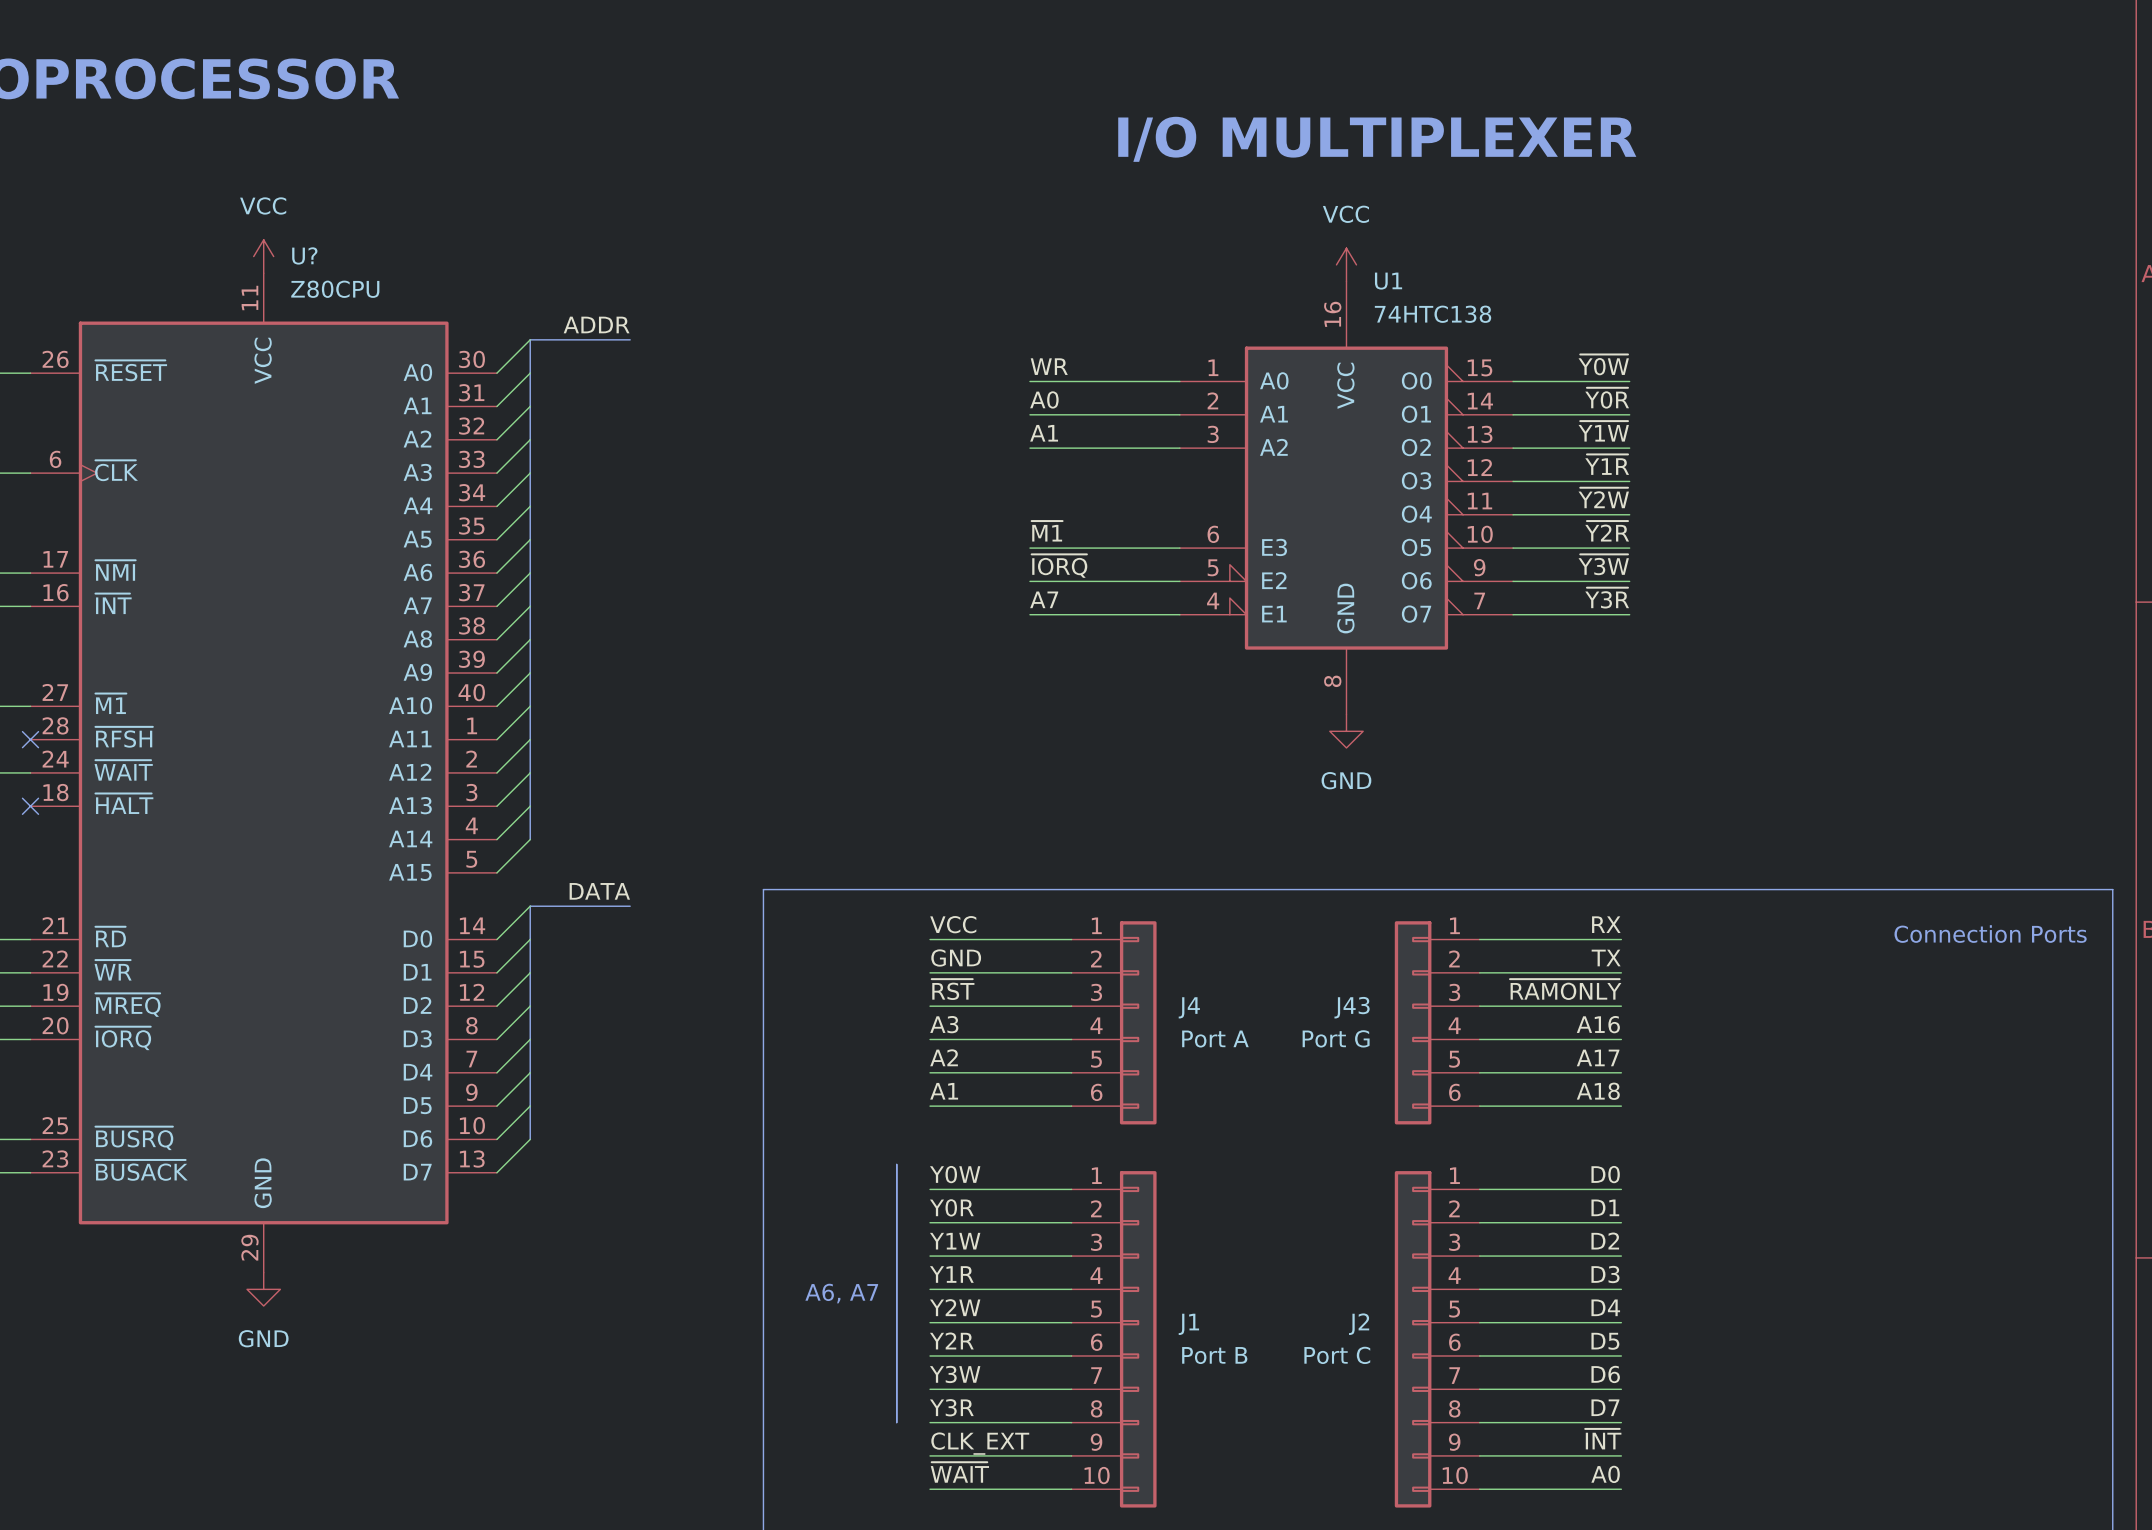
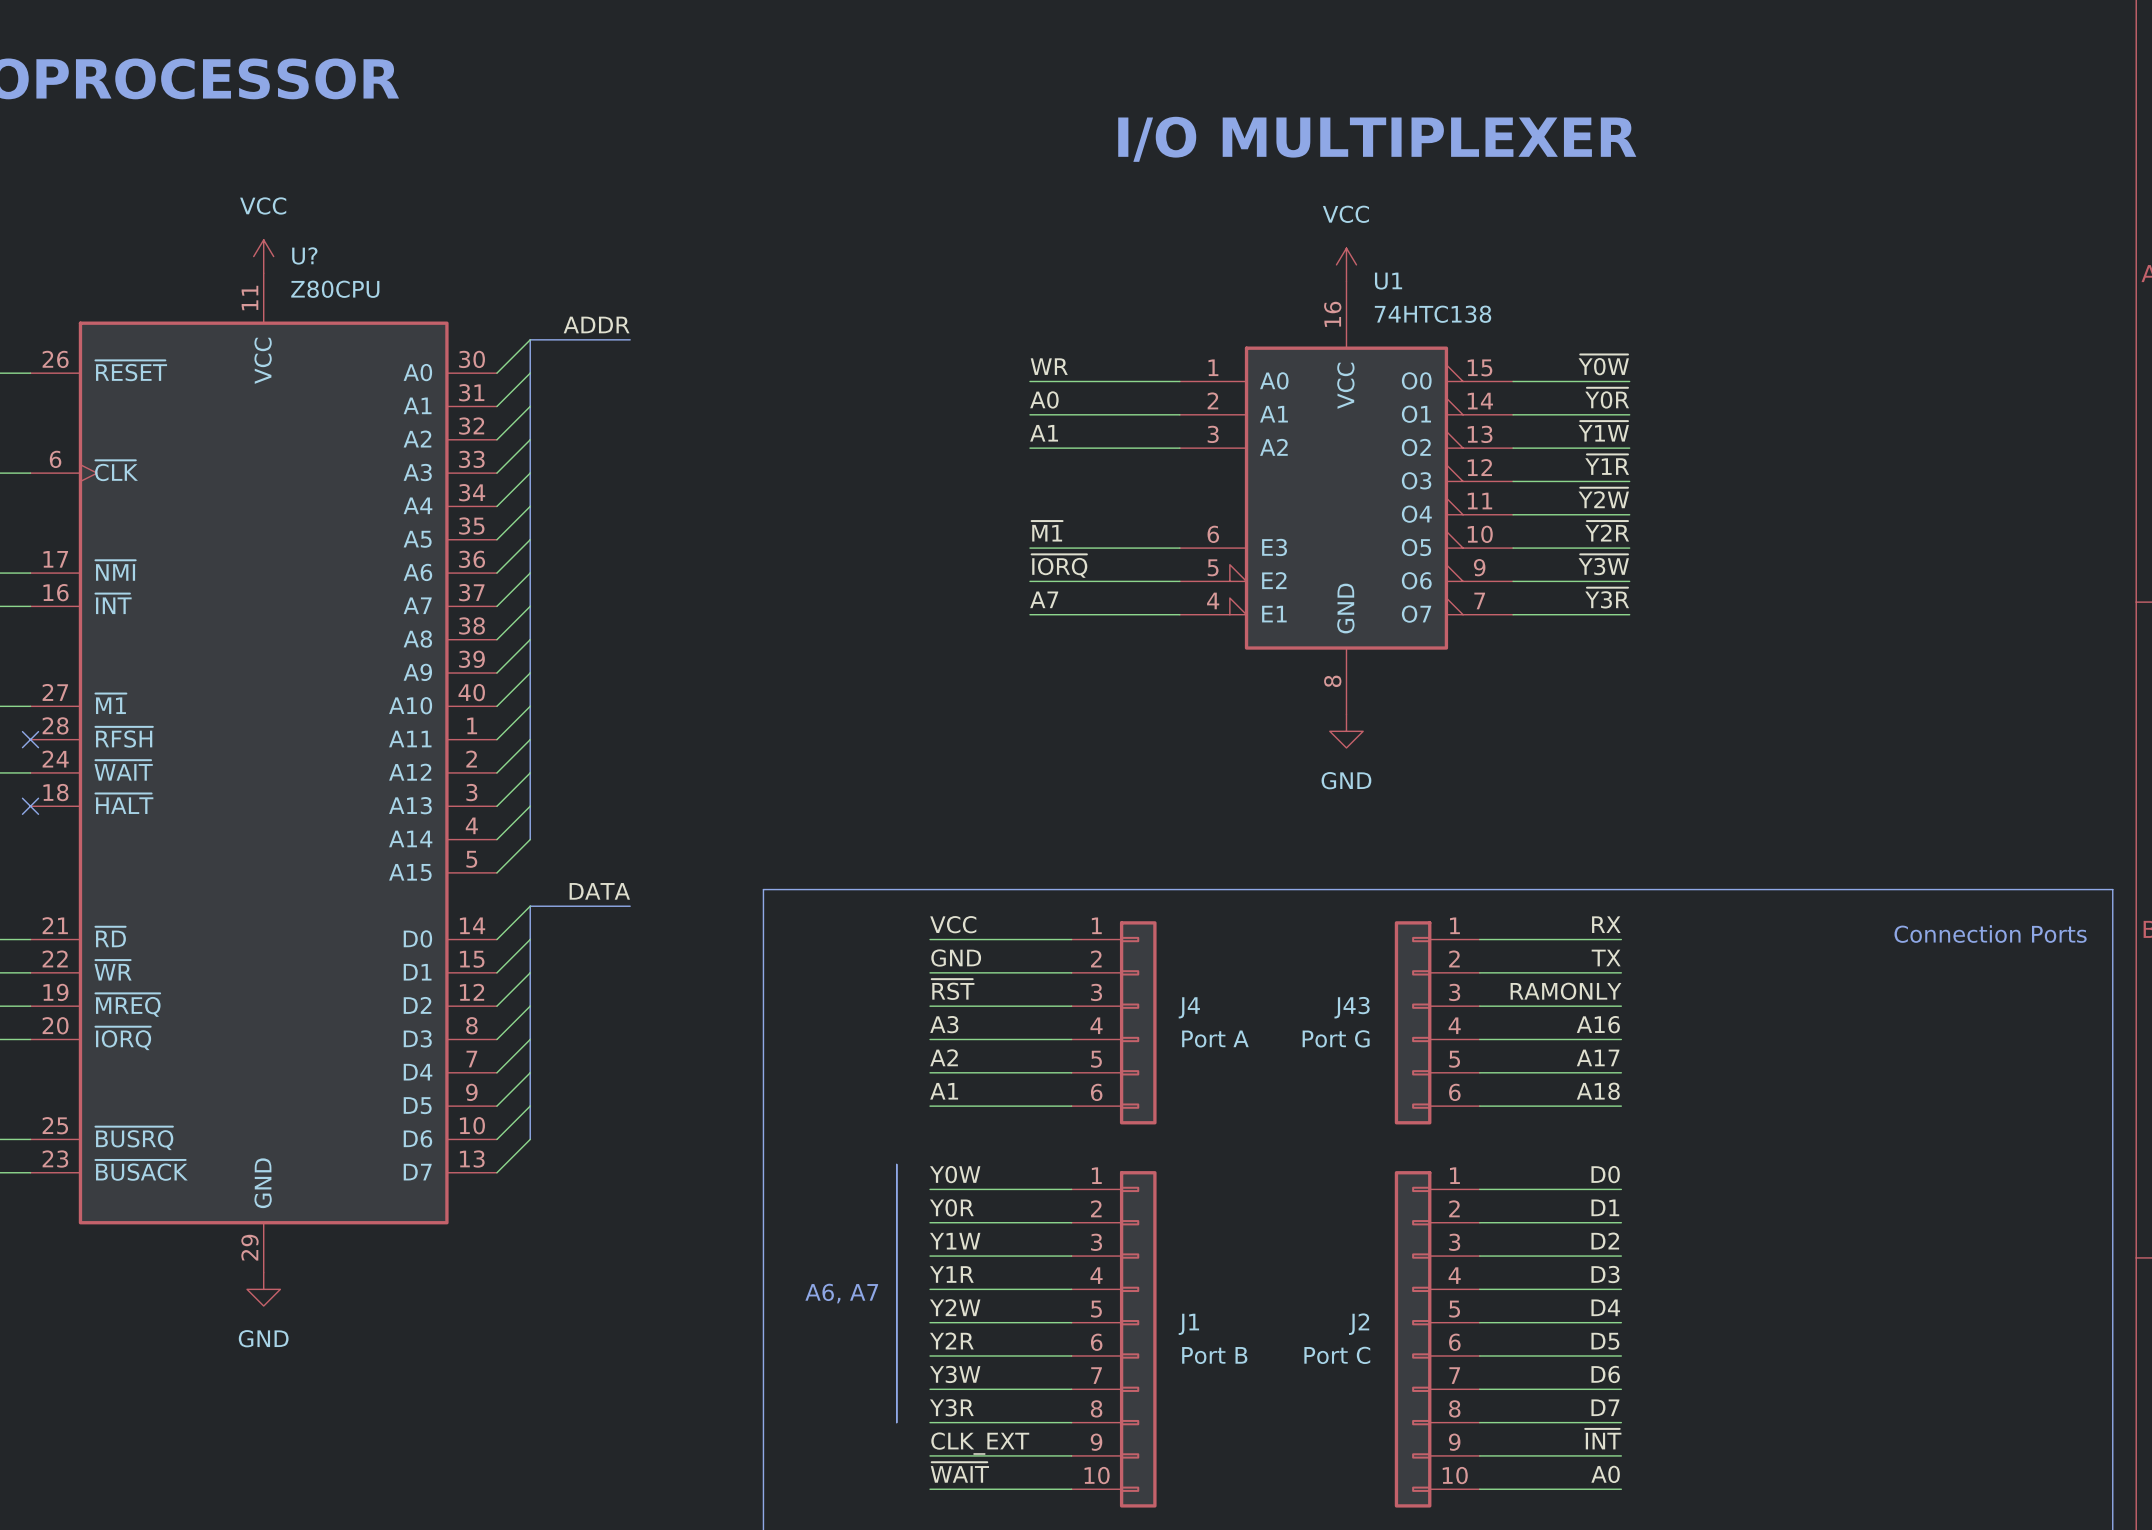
label: ~{RAMONLY} (1565, 989) -> RAMONLY (1565, 991)

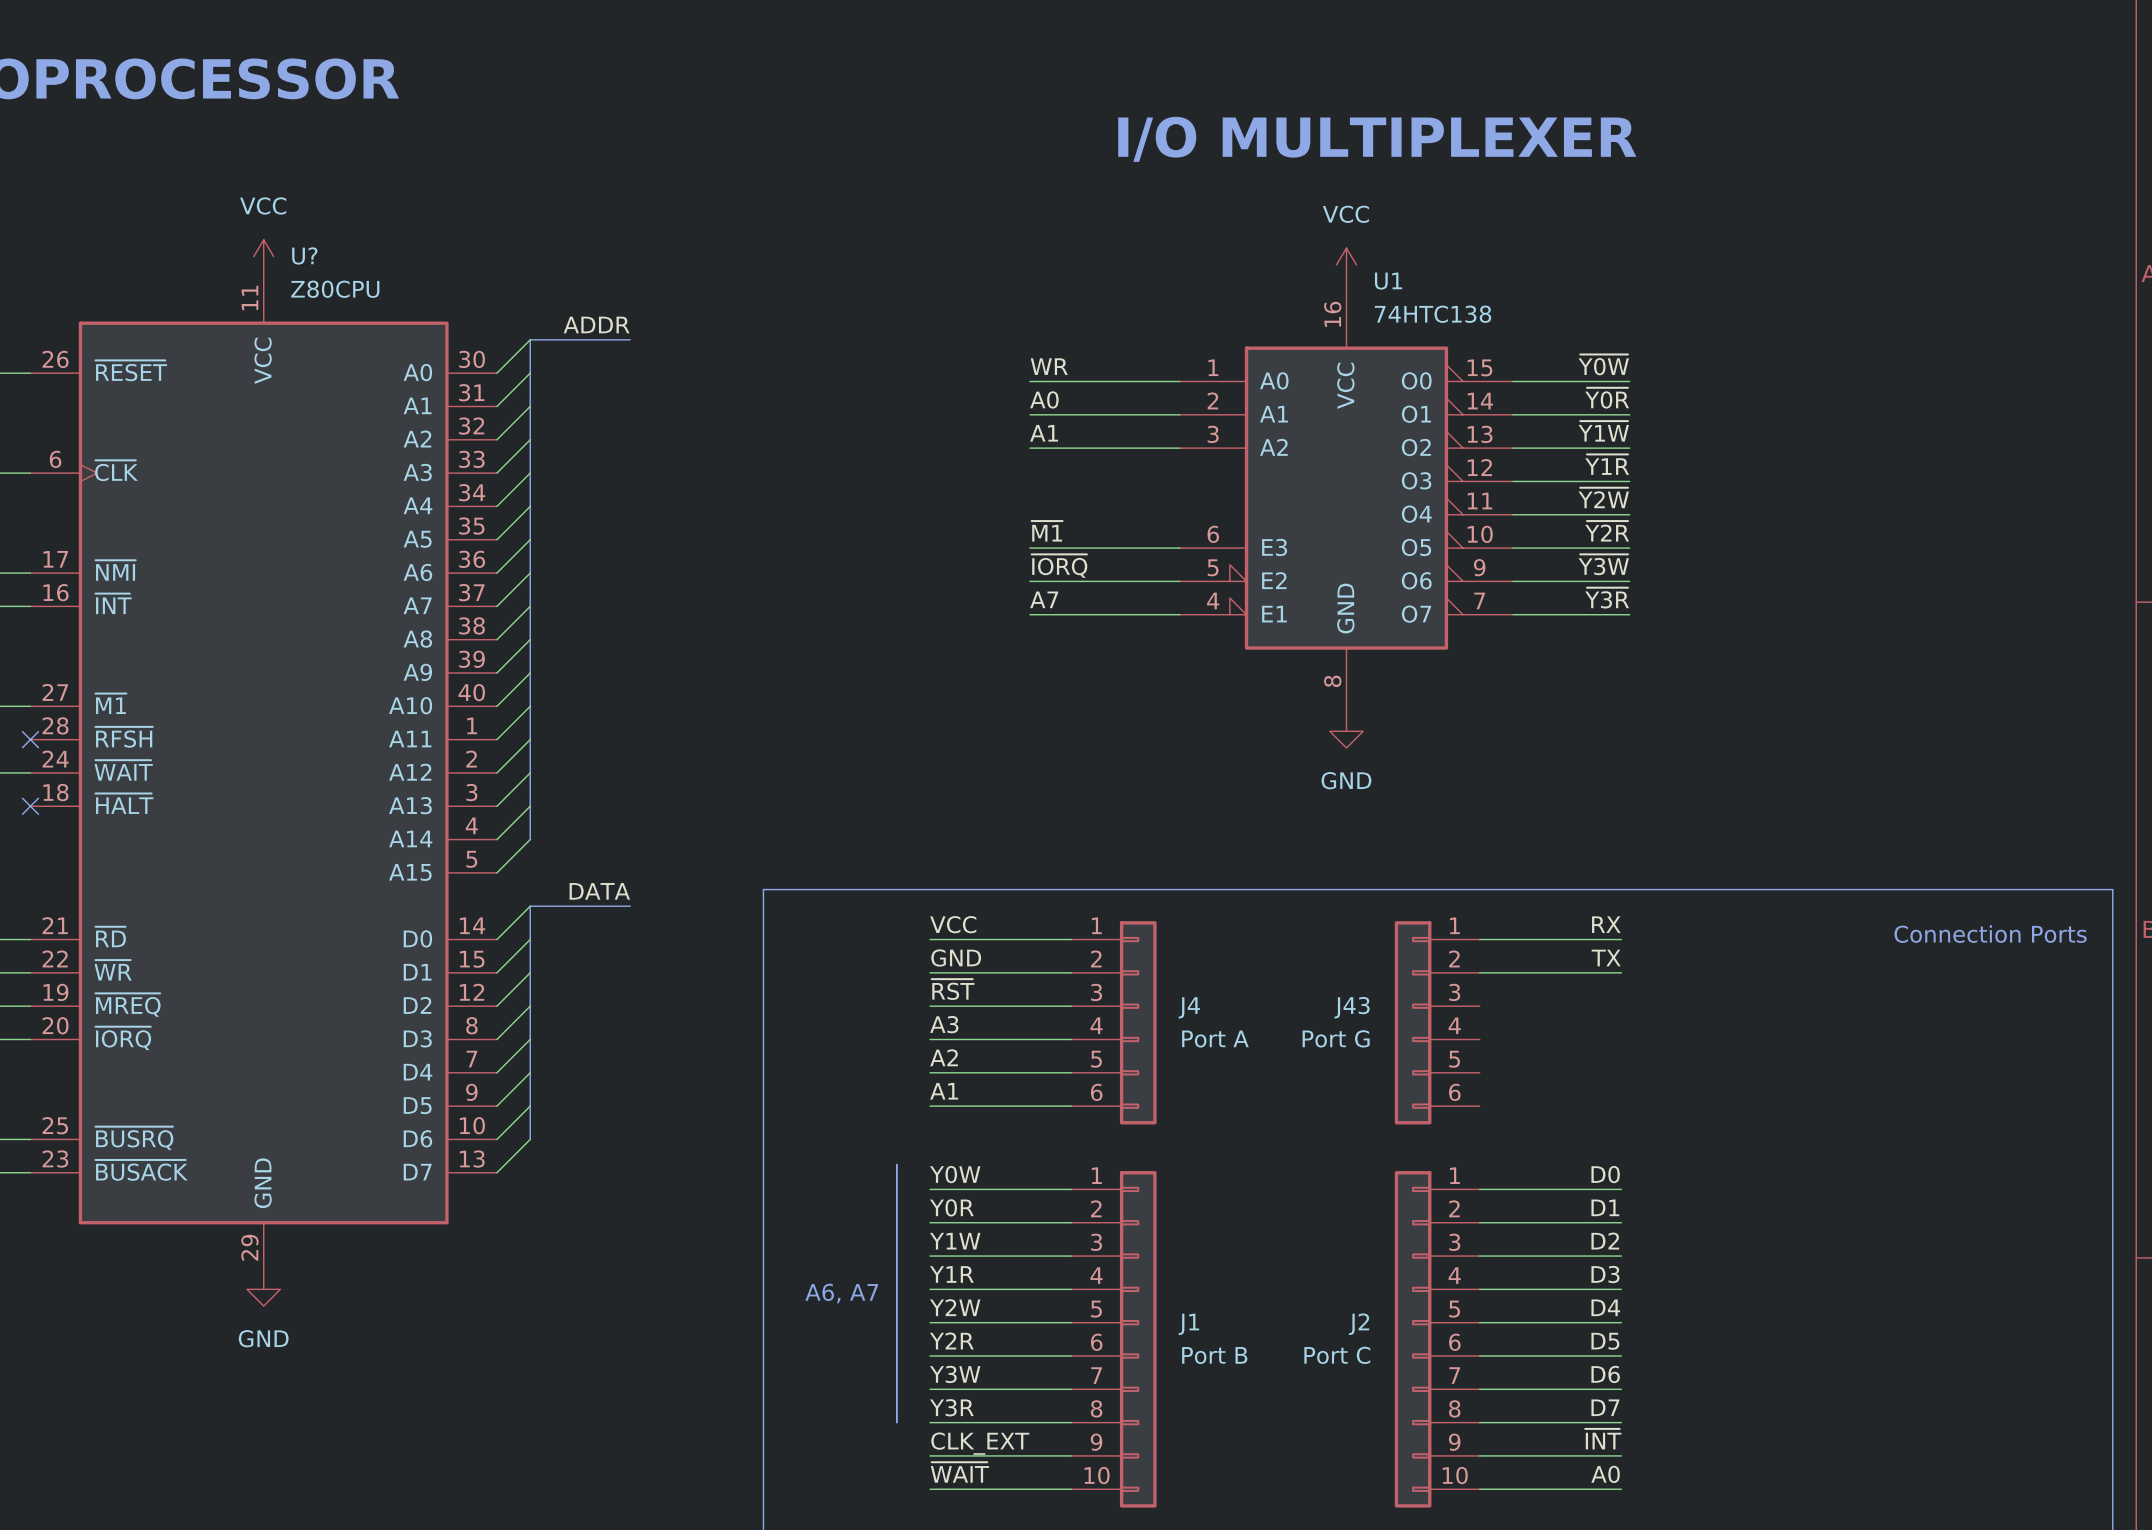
label: RAMONLY (1565, 991) -> none
wire: (1479, 1006) (1621, 1006) -> none
label: A16 (1598, 1024) -> none
wire: (1479, 1039) (1621, 1039) -> none
label: A17 (1598, 1057) -> none
wire: (1479, 1072) (1621, 1072) -> none
label: A18 (1598, 1091) -> none
wire: (1479, 1106) (1621, 1106) -> none

